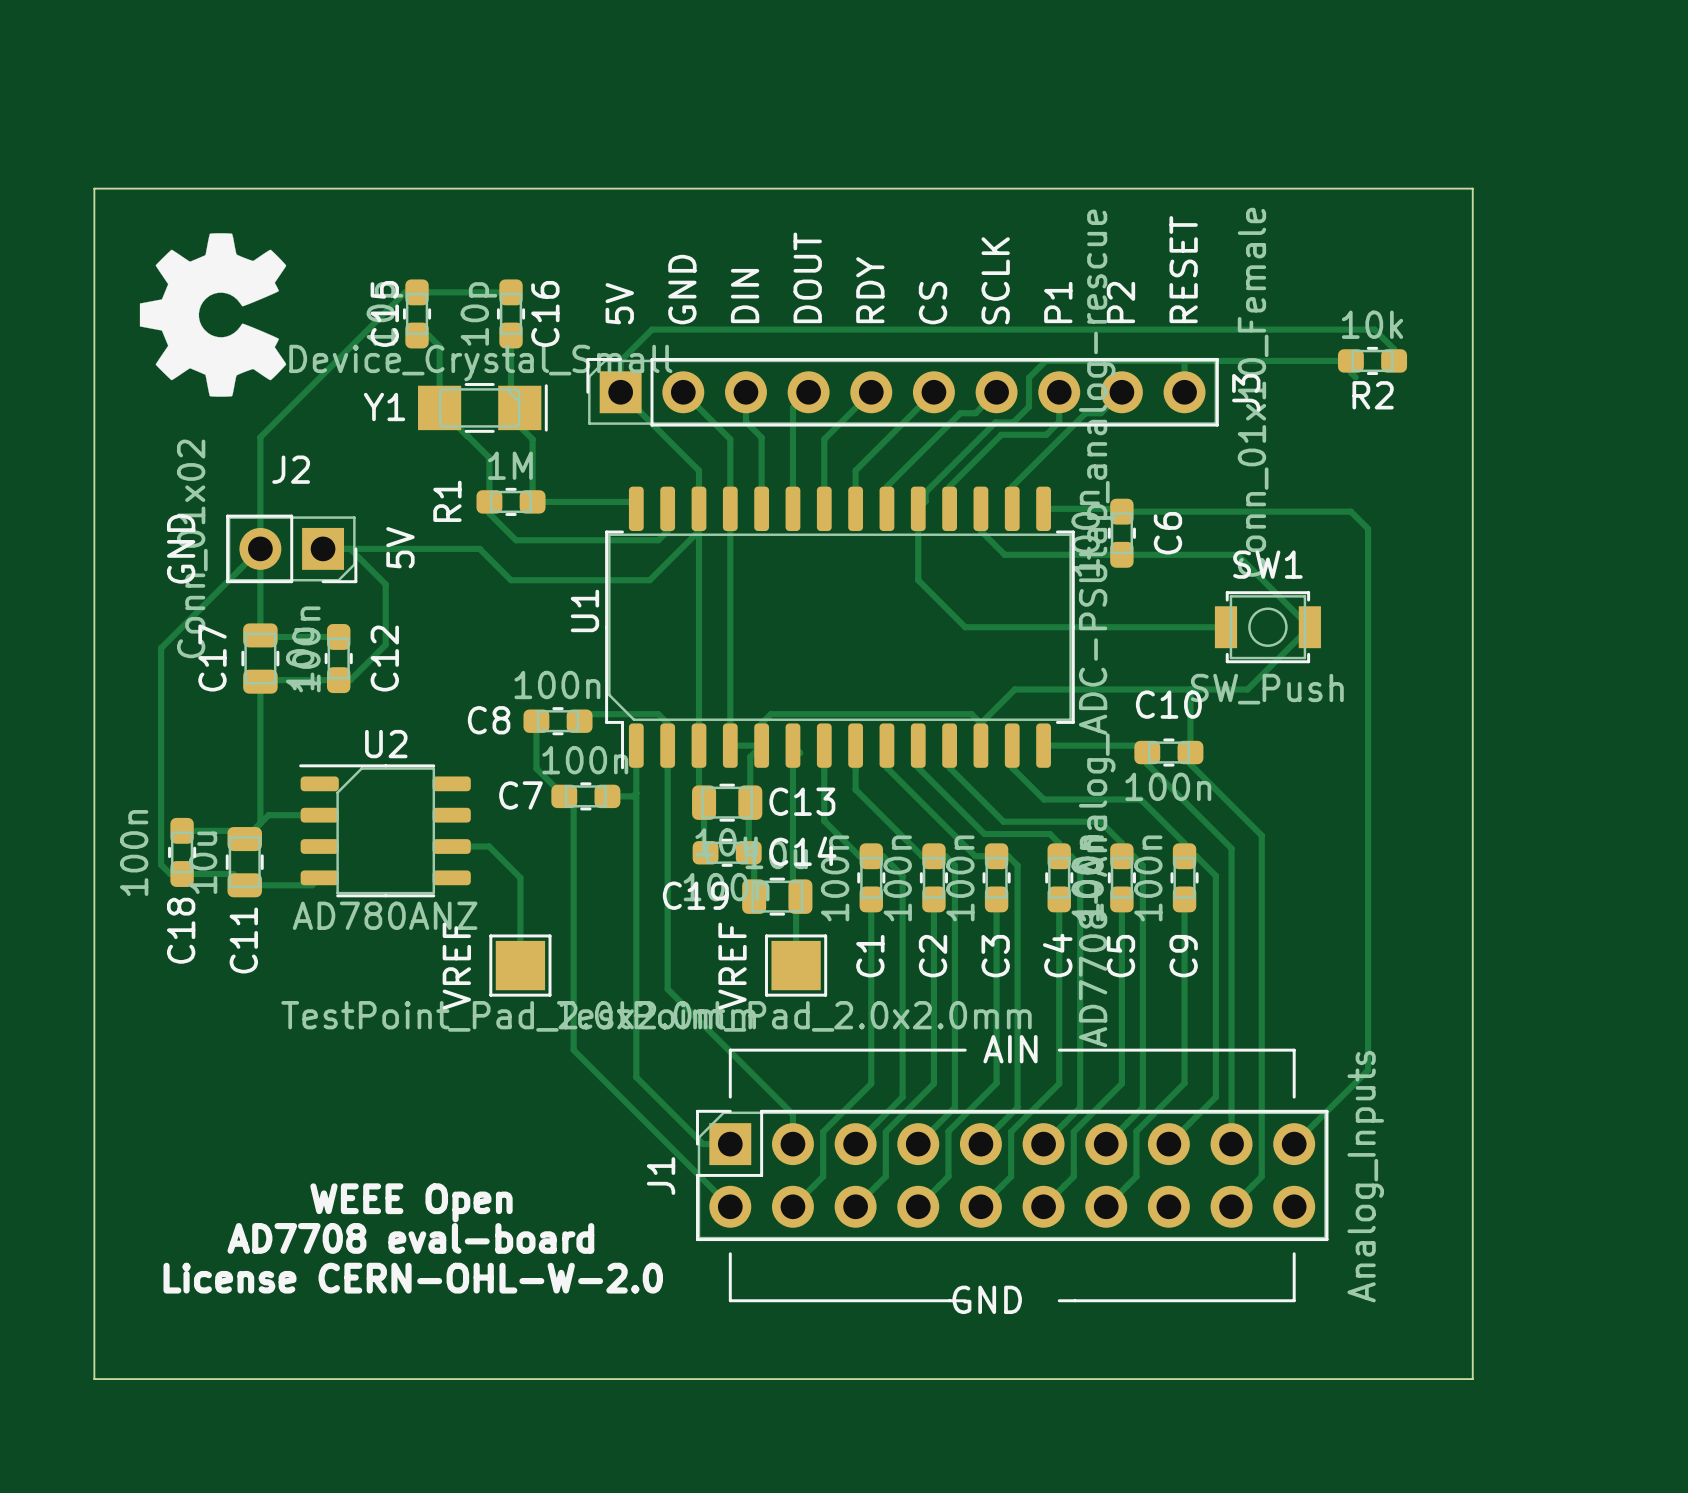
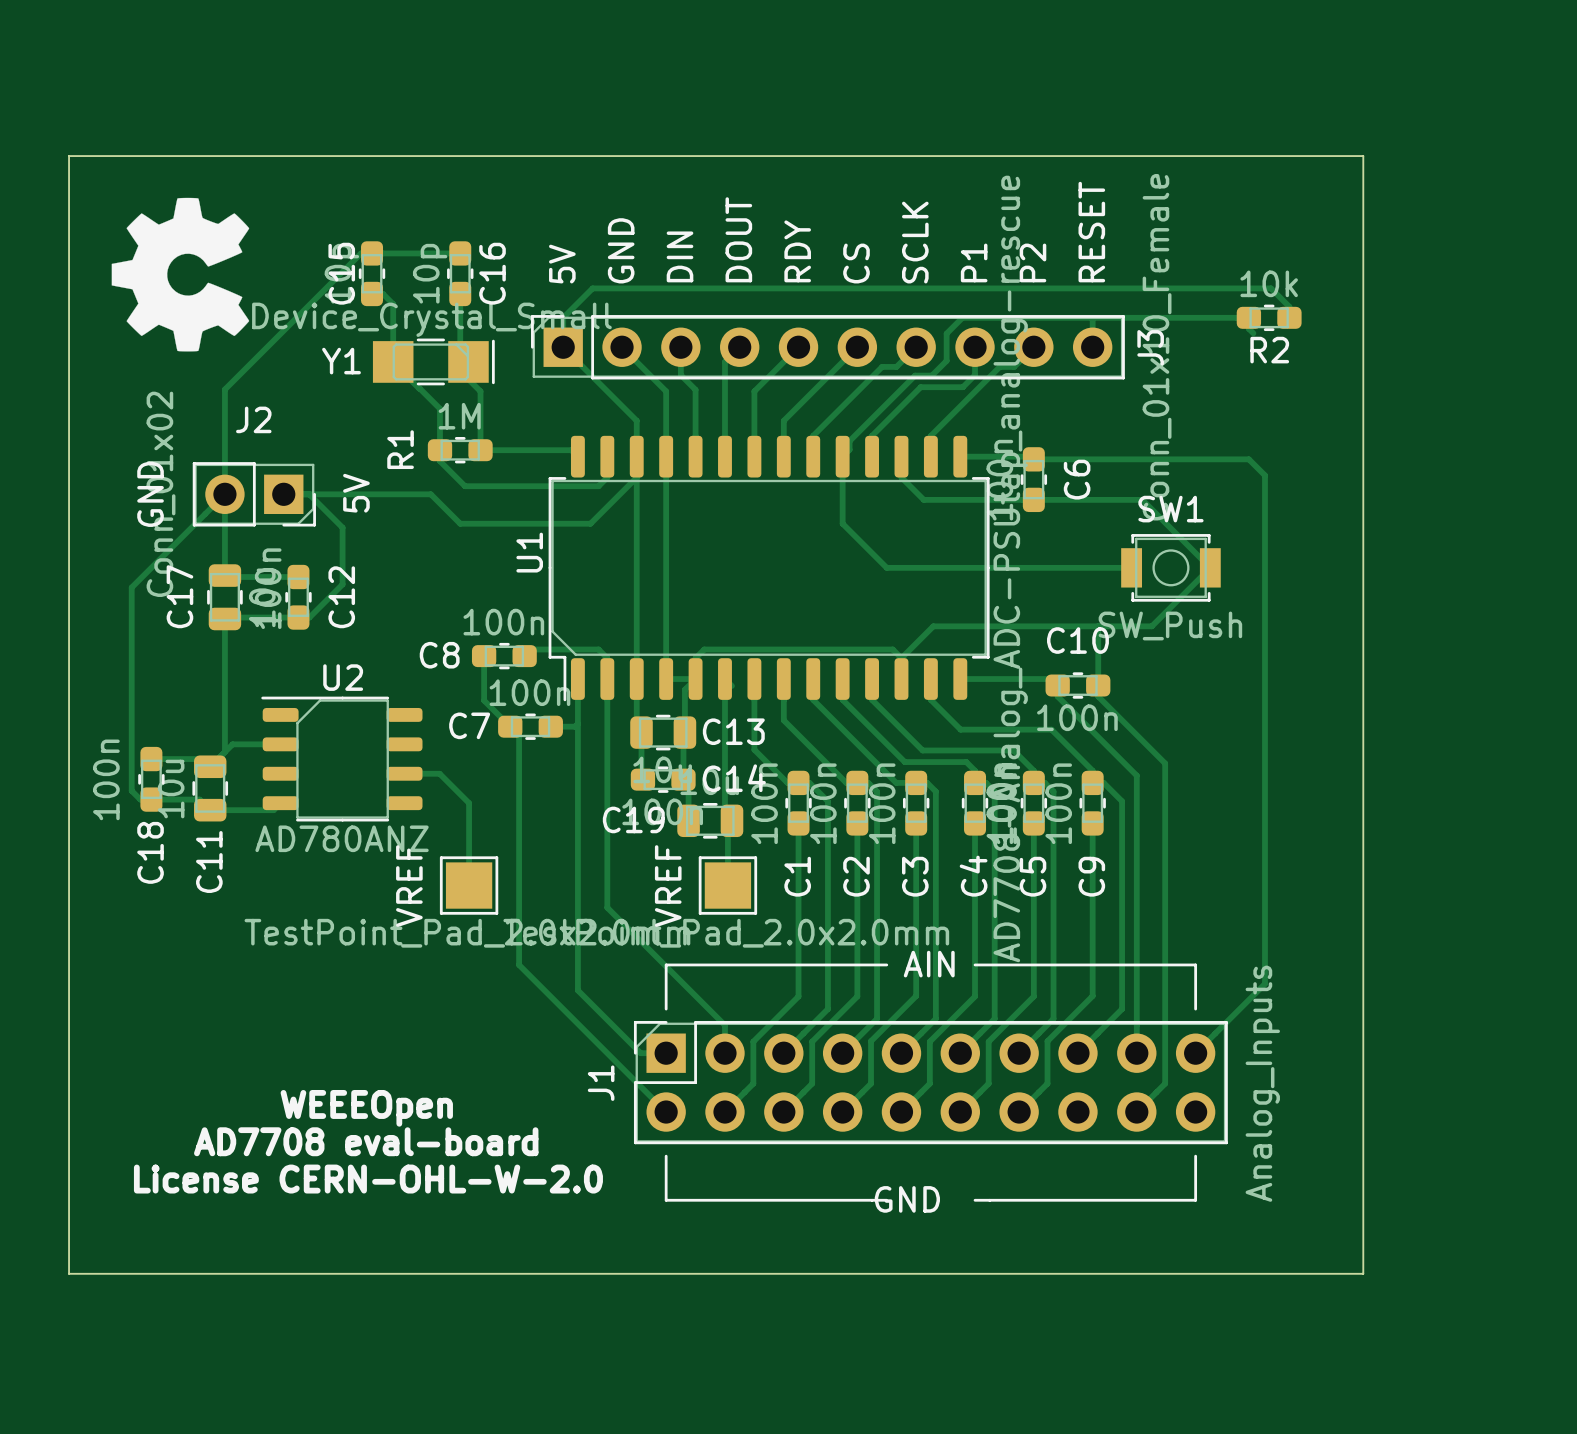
text: WEEE Open (411, 1202) -> WEEEOpen (366, 1108)

